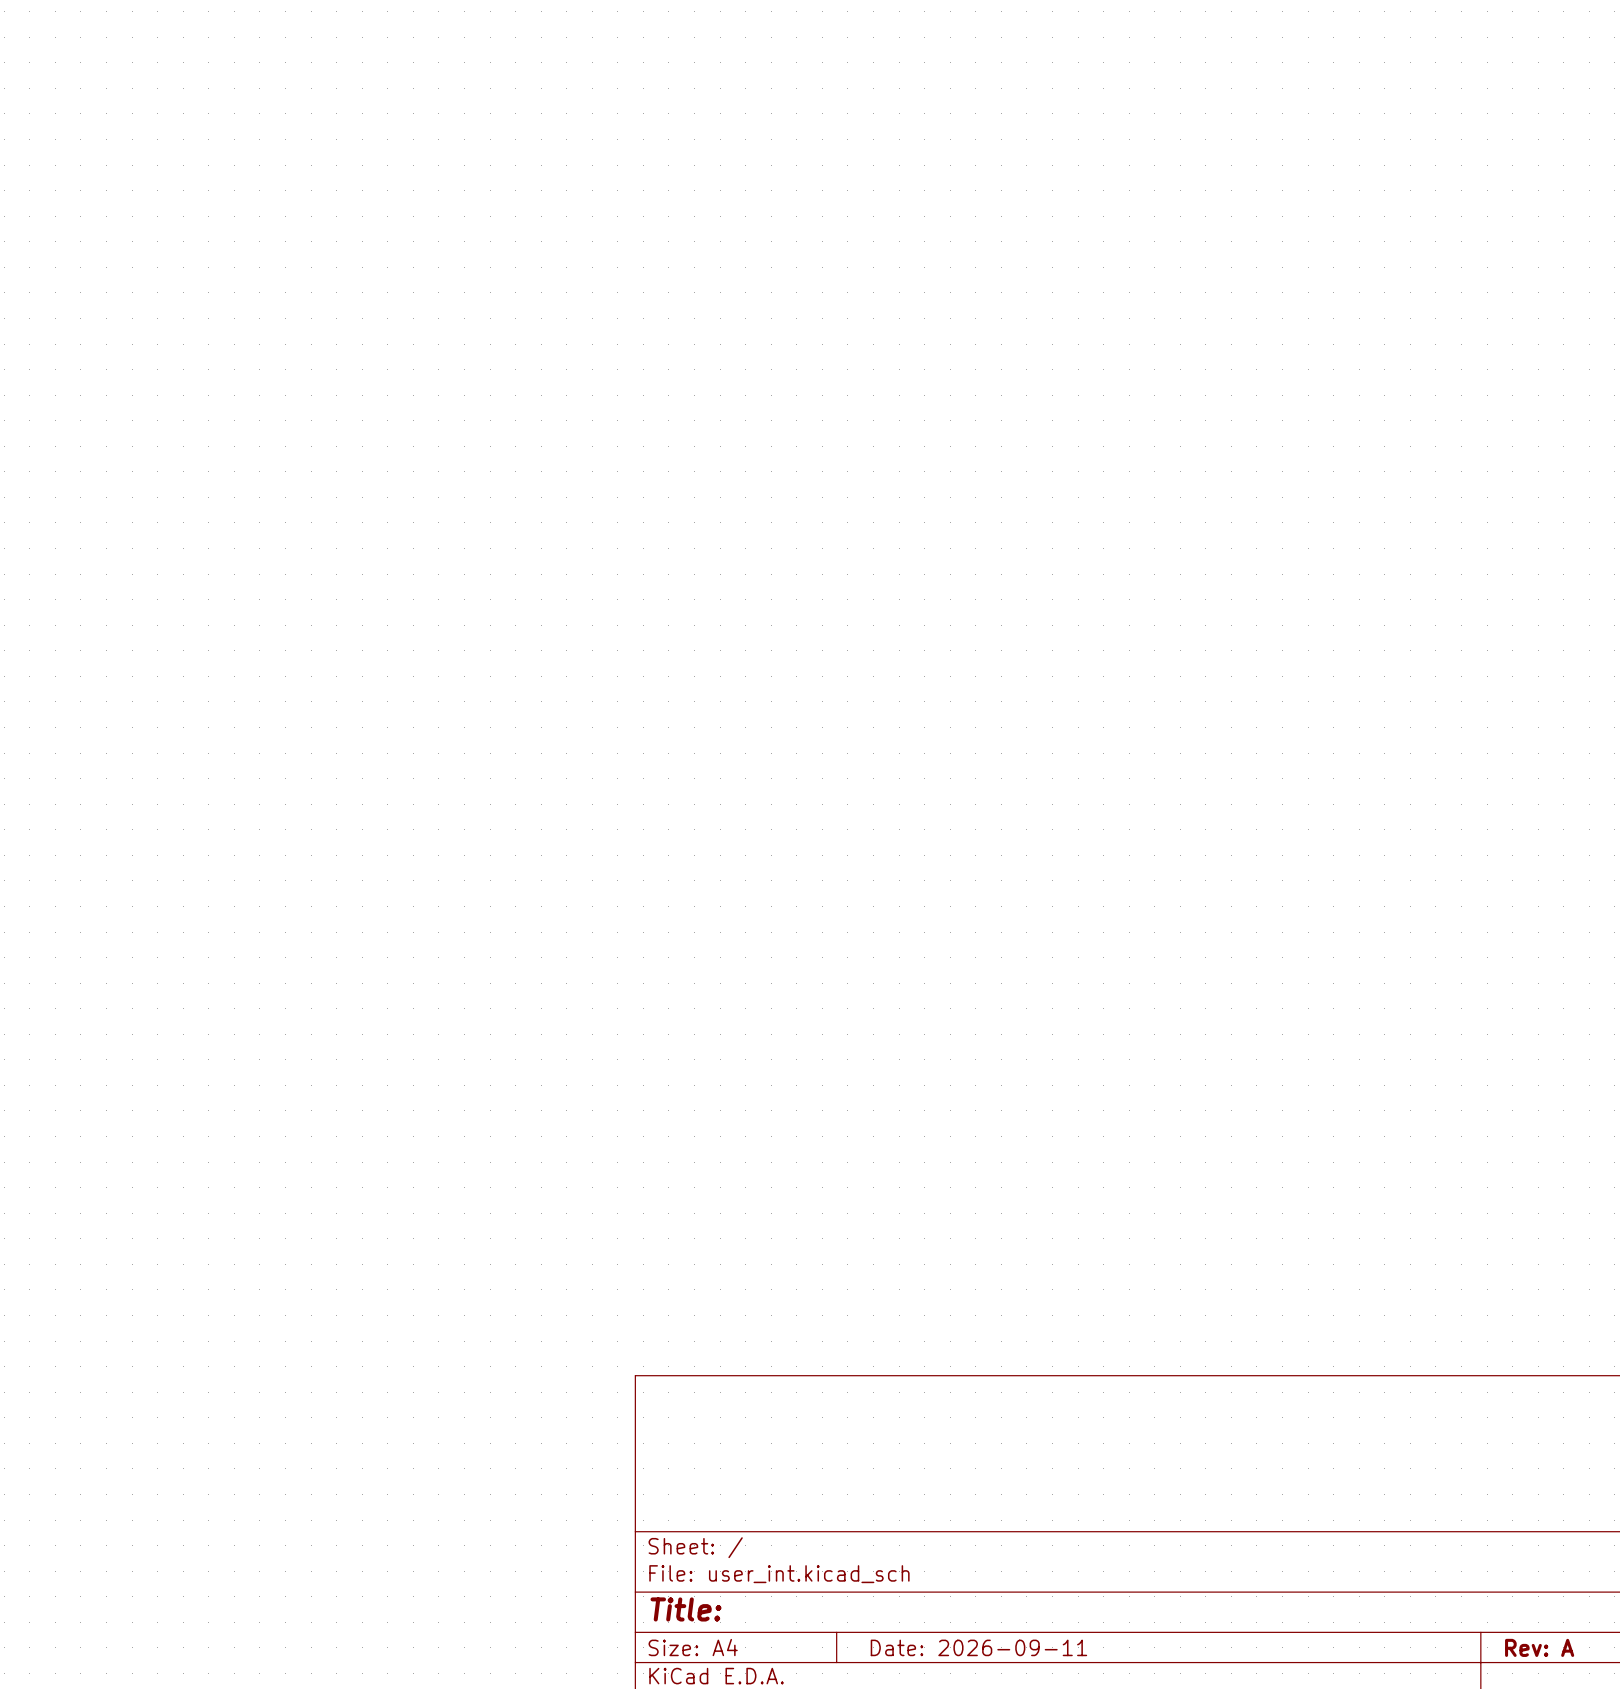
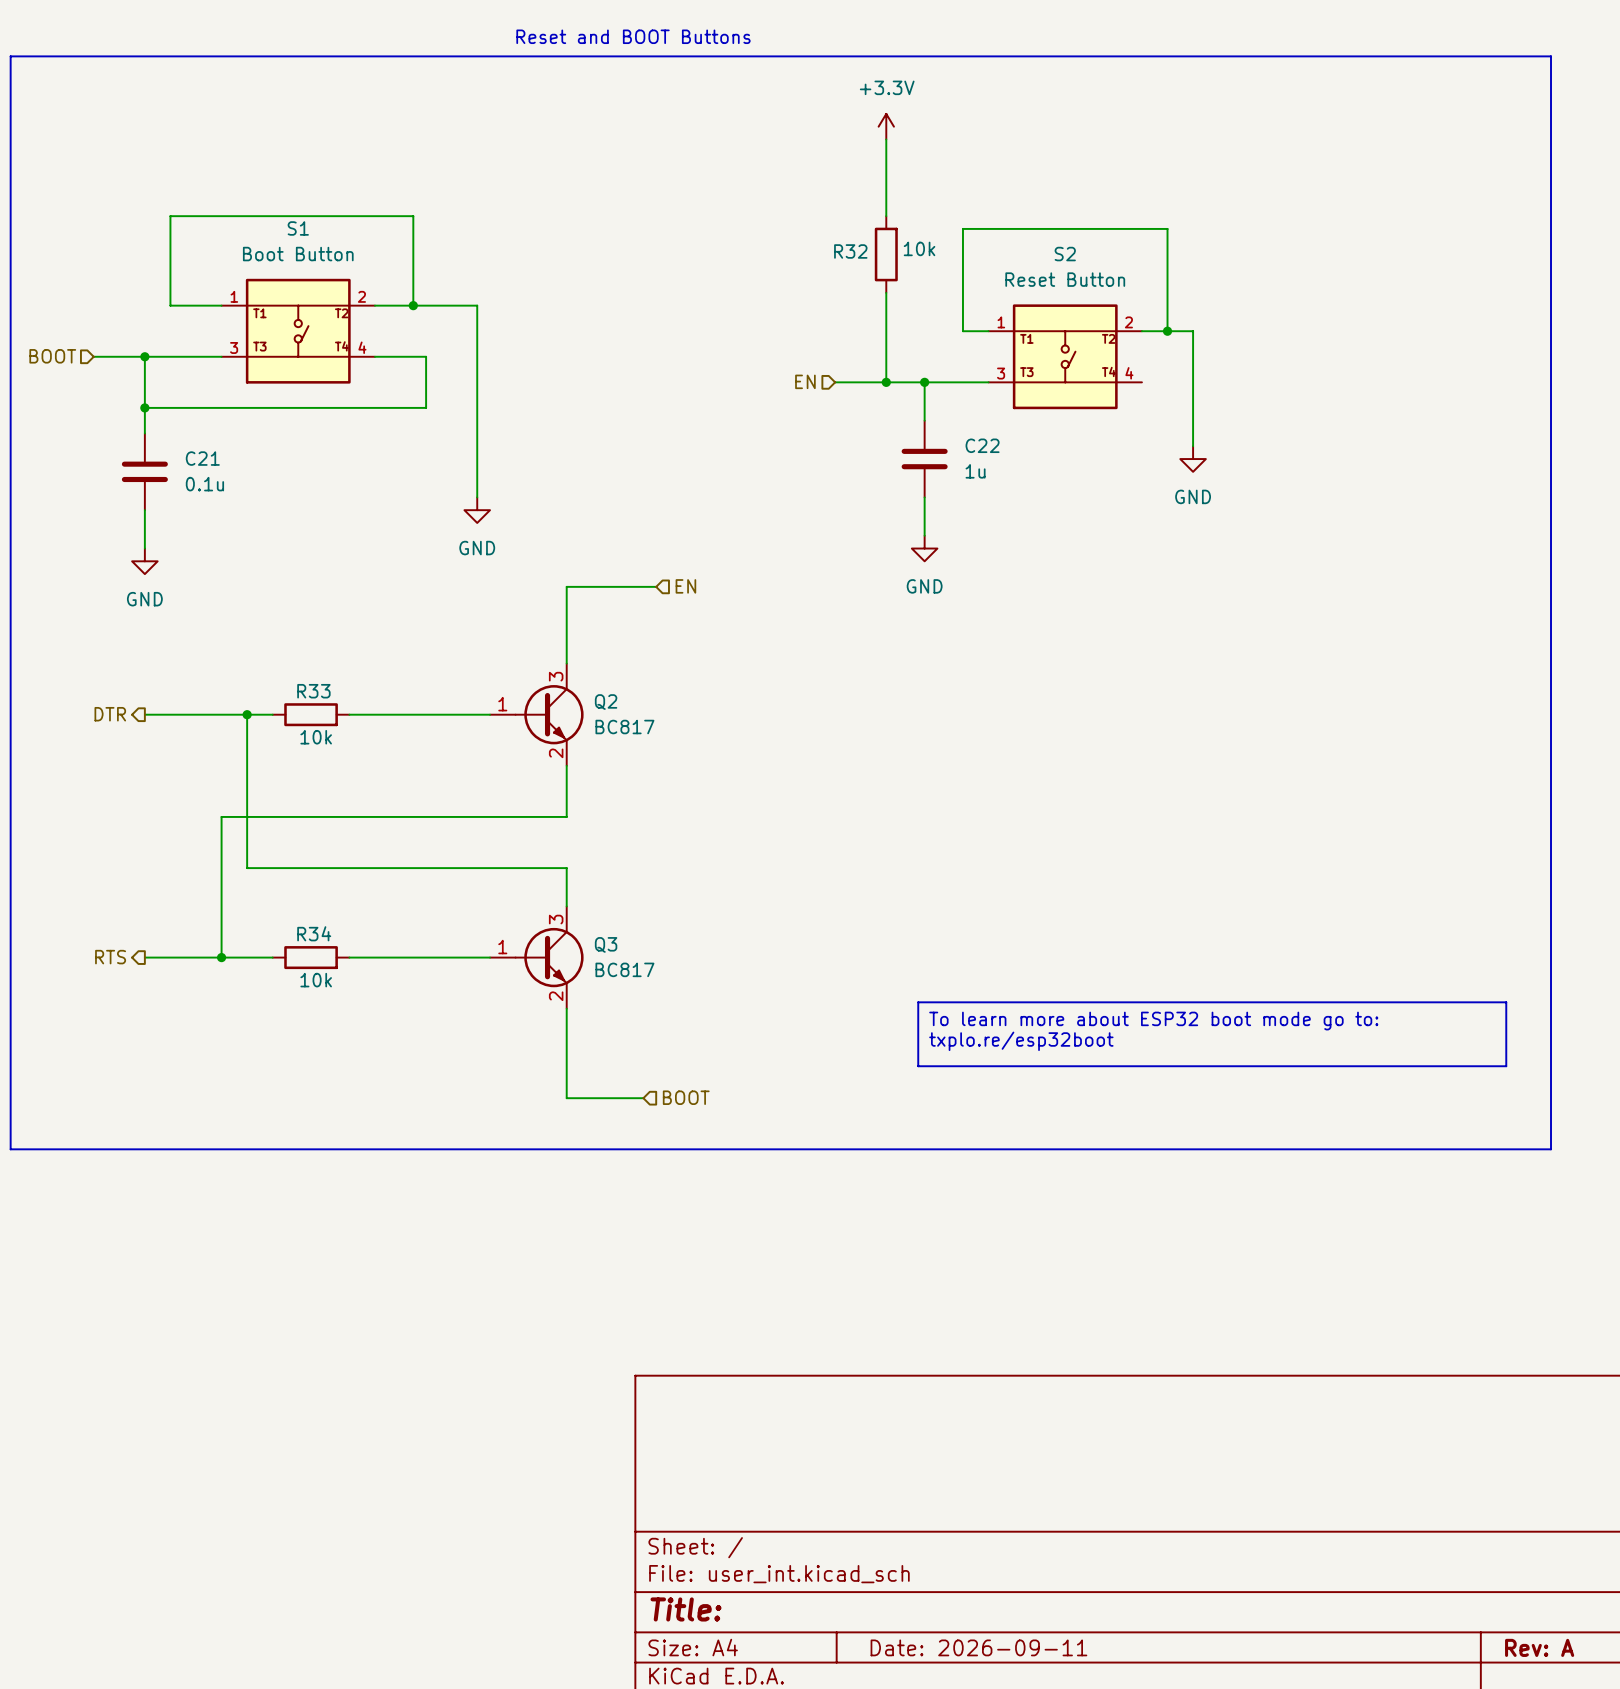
text: none -> Reset and BOOT Buttons (633, 36)
line: none -> (10, 56) (1551, 56) (1551, 1149) (10, 1149) (10, 56)
power symbol: none -> +3.3V (886, 126)
wire: none -> (886, 139) (886, 216)
R32: none -> 10k (886, 254)
wire: none -> (886, 292) (886, 382)
wire: none -> (221, 305) (170, 305) (170, 216) (413, 216) (413, 305)
wire: none -> (374, 305) (477, 305) (477, 497)
junction: none -> (413, 305)
S1: none -> Boot Button (298, 331)
wire: none -> (988, 331) (962, 331) (962, 228) (1167, 228) (1167, 331)
wire: none -> (1141, 331) (1193, 331) (1193, 446)
junction: none -> (1167, 331)
hierarchical label: none -> BOOT (52, 356)
wire: none -> (93, 356) (221, 356)
wire: none -> (144, 356) (144, 433)
junction: none -> (144, 356)
wire: none -> (374, 356) (426, 356) (426, 407) (144, 407)
S2: none -> Reset Button (1065, 356)
hierarchical label: none -> EN (805, 381)
wire: none -> (835, 382) (988, 382)
junction: none -> (886, 382)
wire: none -> (924, 382) (924, 420)
junction: none -> (924, 382)
junction: none -> (144, 407)
C22: none -> 1u (924, 459)
power symbol: none -> GND (1193, 459)
C21: none -> 0.1u (144, 471)
wire: none -> (924, 497) (924, 535)
wire: none -> (144, 510) (144, 548)
power symbol: none -> GND (477, 510)
power symbol: none -> GND (924, 548)
power symbol: none -> GND (144, 561)
wire: none -> (656, 586) (566, 586) (566, 663)
hierarchical label: none -> EN (685, 586)
hierarchical label: none -> DTR (110, 714)
wire: none -> (144, 714) (272, 714)
wire: none -> (247, 714) (247, 868) (566, 868) (566, 906)
junction: none -> (247, 714)
R33: none -> 10k (311, 714)
wire: none -> (349, 714) (490, 714)
Q2: none -> BC817 (536, 714)
wire: none -> (566, 765) (566, 816) (221, 816) (221, 957)
hierarchical label: none -> RTS (110, 957)
wire: none -> (144, 957) (272, 957)
junction: none -> (221, 957)
R34: none -> 10k (311, 957)
wire: none -> (349, 957) (490, 957)
Q3: none -> BC817 (536, 957)
line: none -> (918, 1002) (1506, 1002) (1506, 1066) (918, 1066) (918, 1002)
wire: none -> (566, 1008) (566, 1098) (643, 1098)
text: none -> To learn more about ESP32 boot mode go to: (1153, 1021)
text: none -> txplo.re/esp32boot (1021, 1041)
hierarchical label: none -> BOOT (686, 1097)

